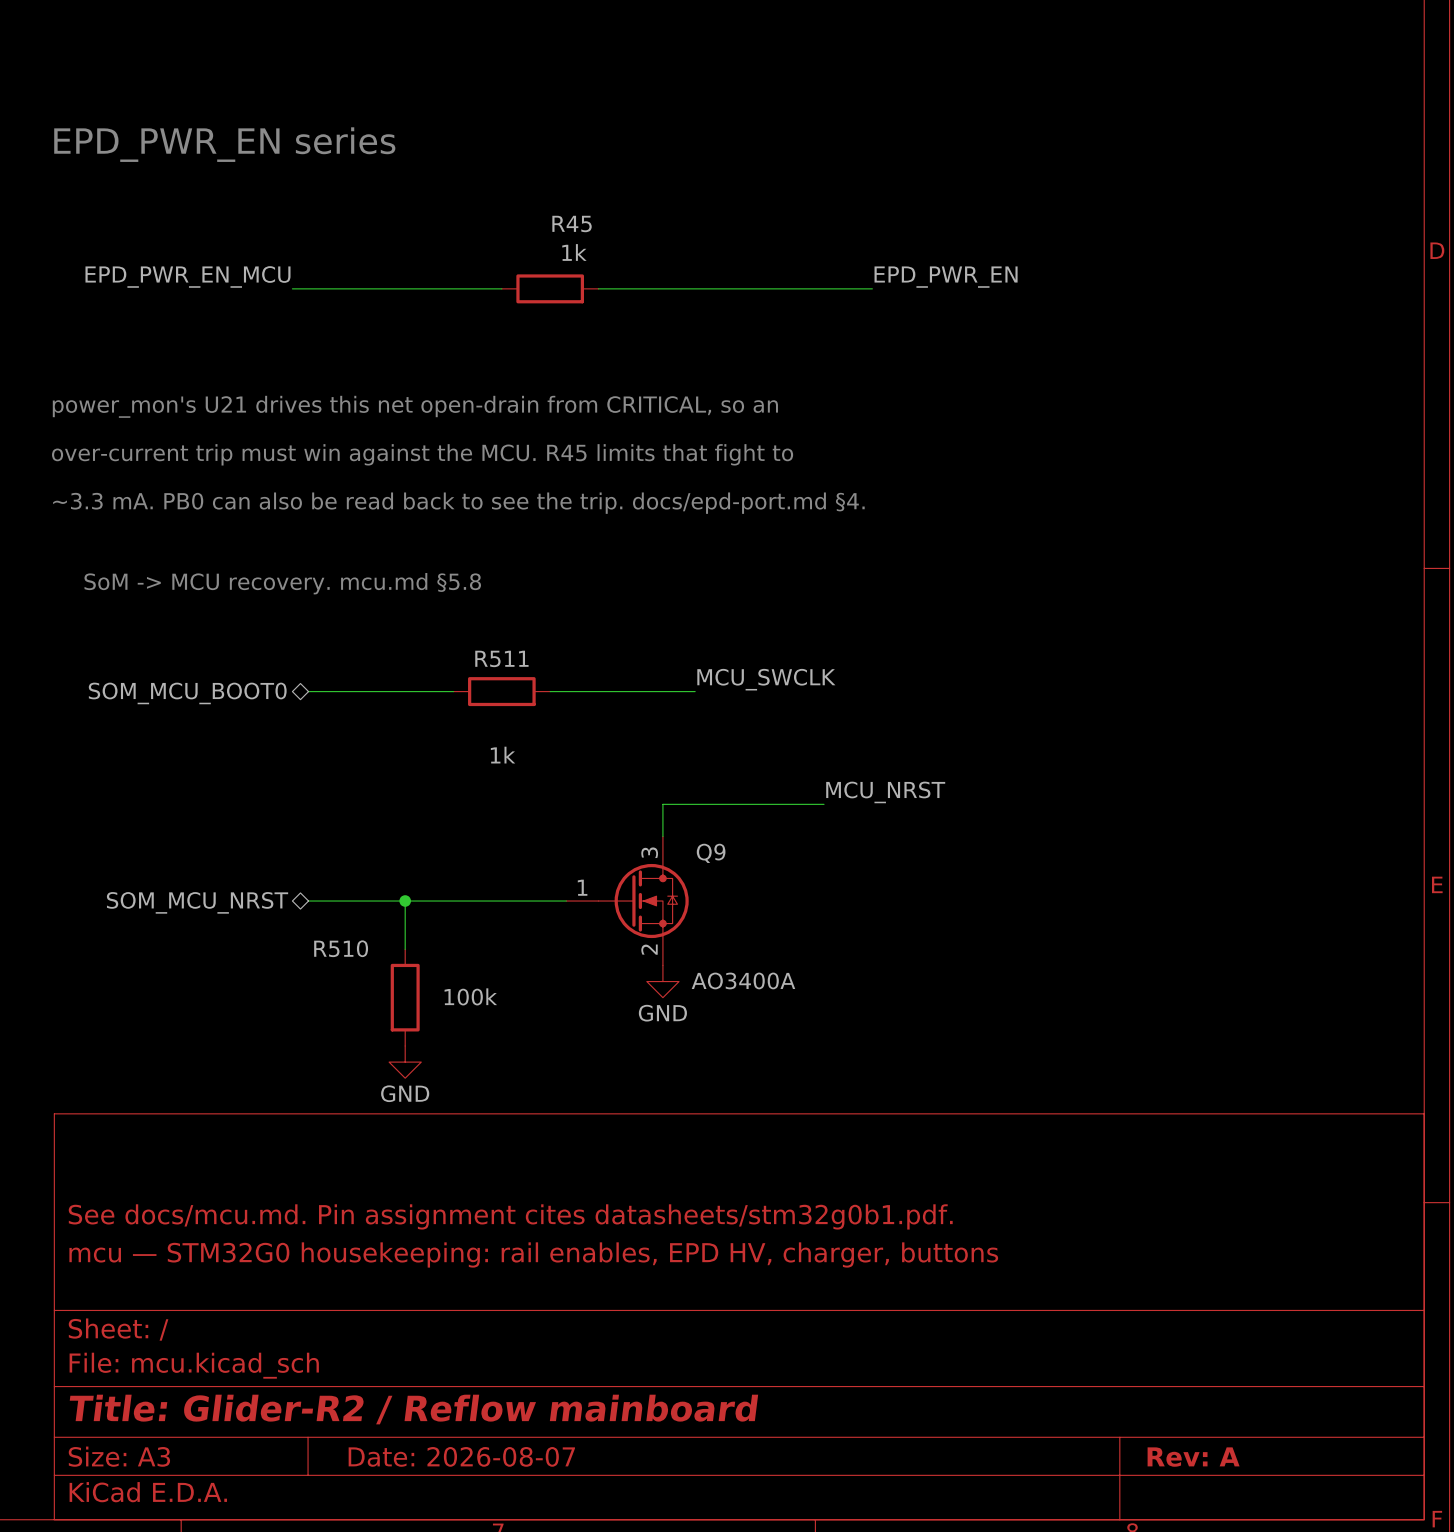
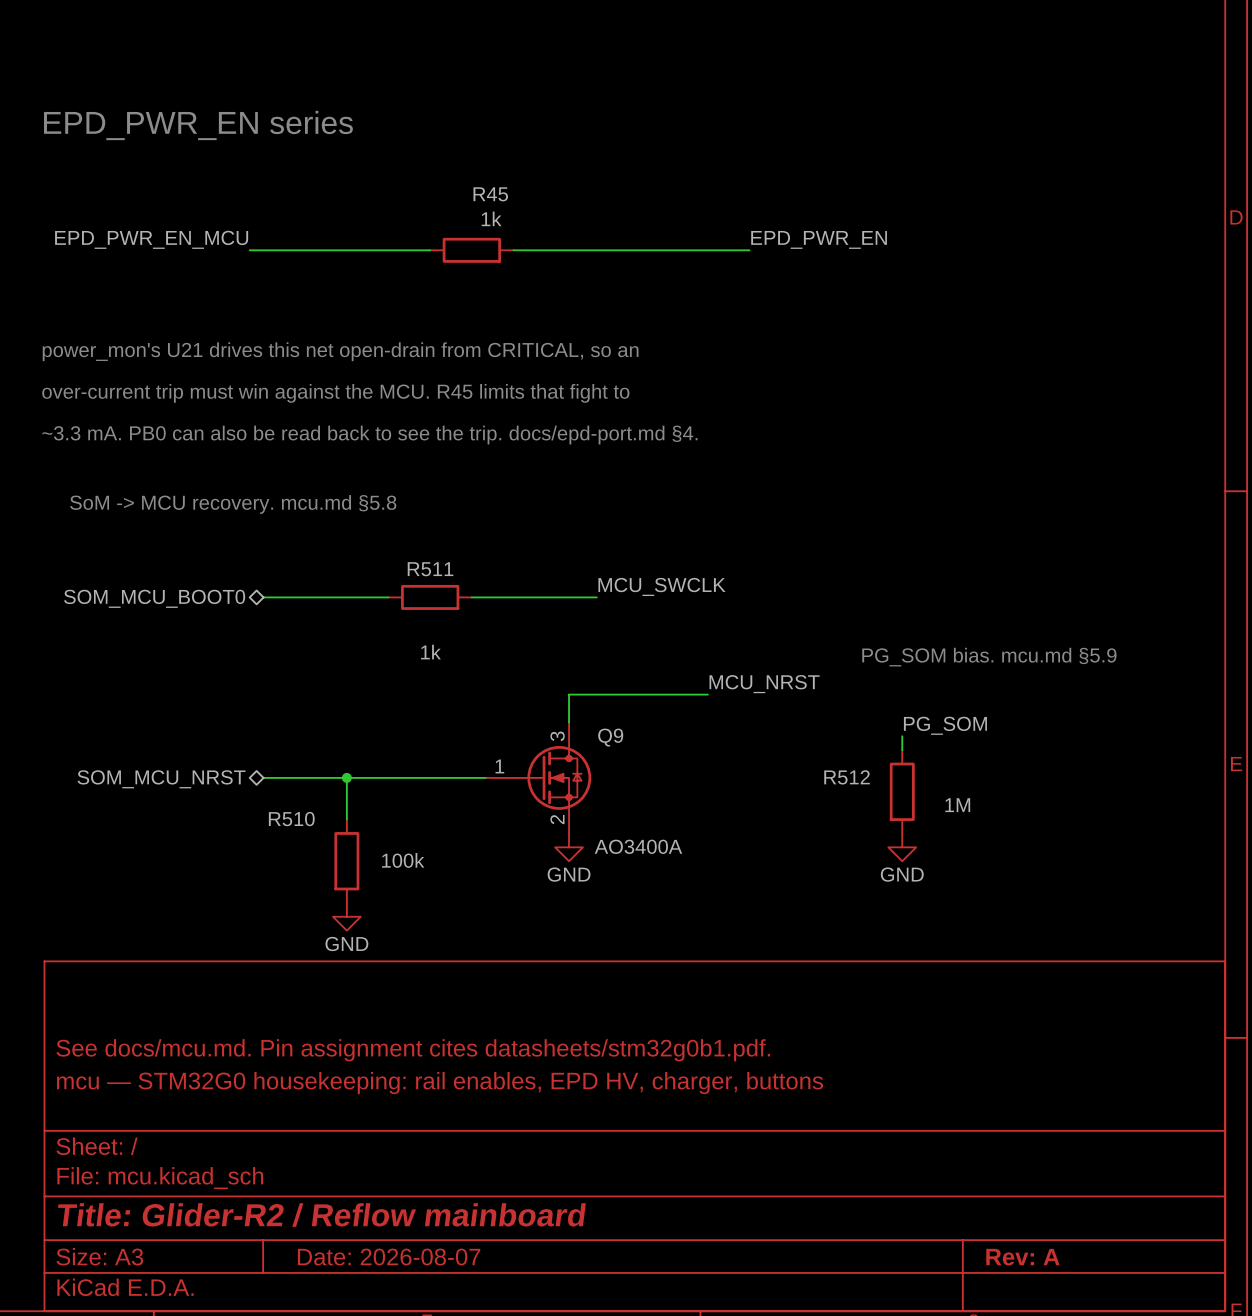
text: none -> PG_SOM bias. mcu.md §5.9 (989, 657)
label: none -> PG_SOM (945, 725)
wire: none -> (902, 736) (902, 750)
R512: none -> 1M (902, 791)
power symbol: none -> GND (902, 847)

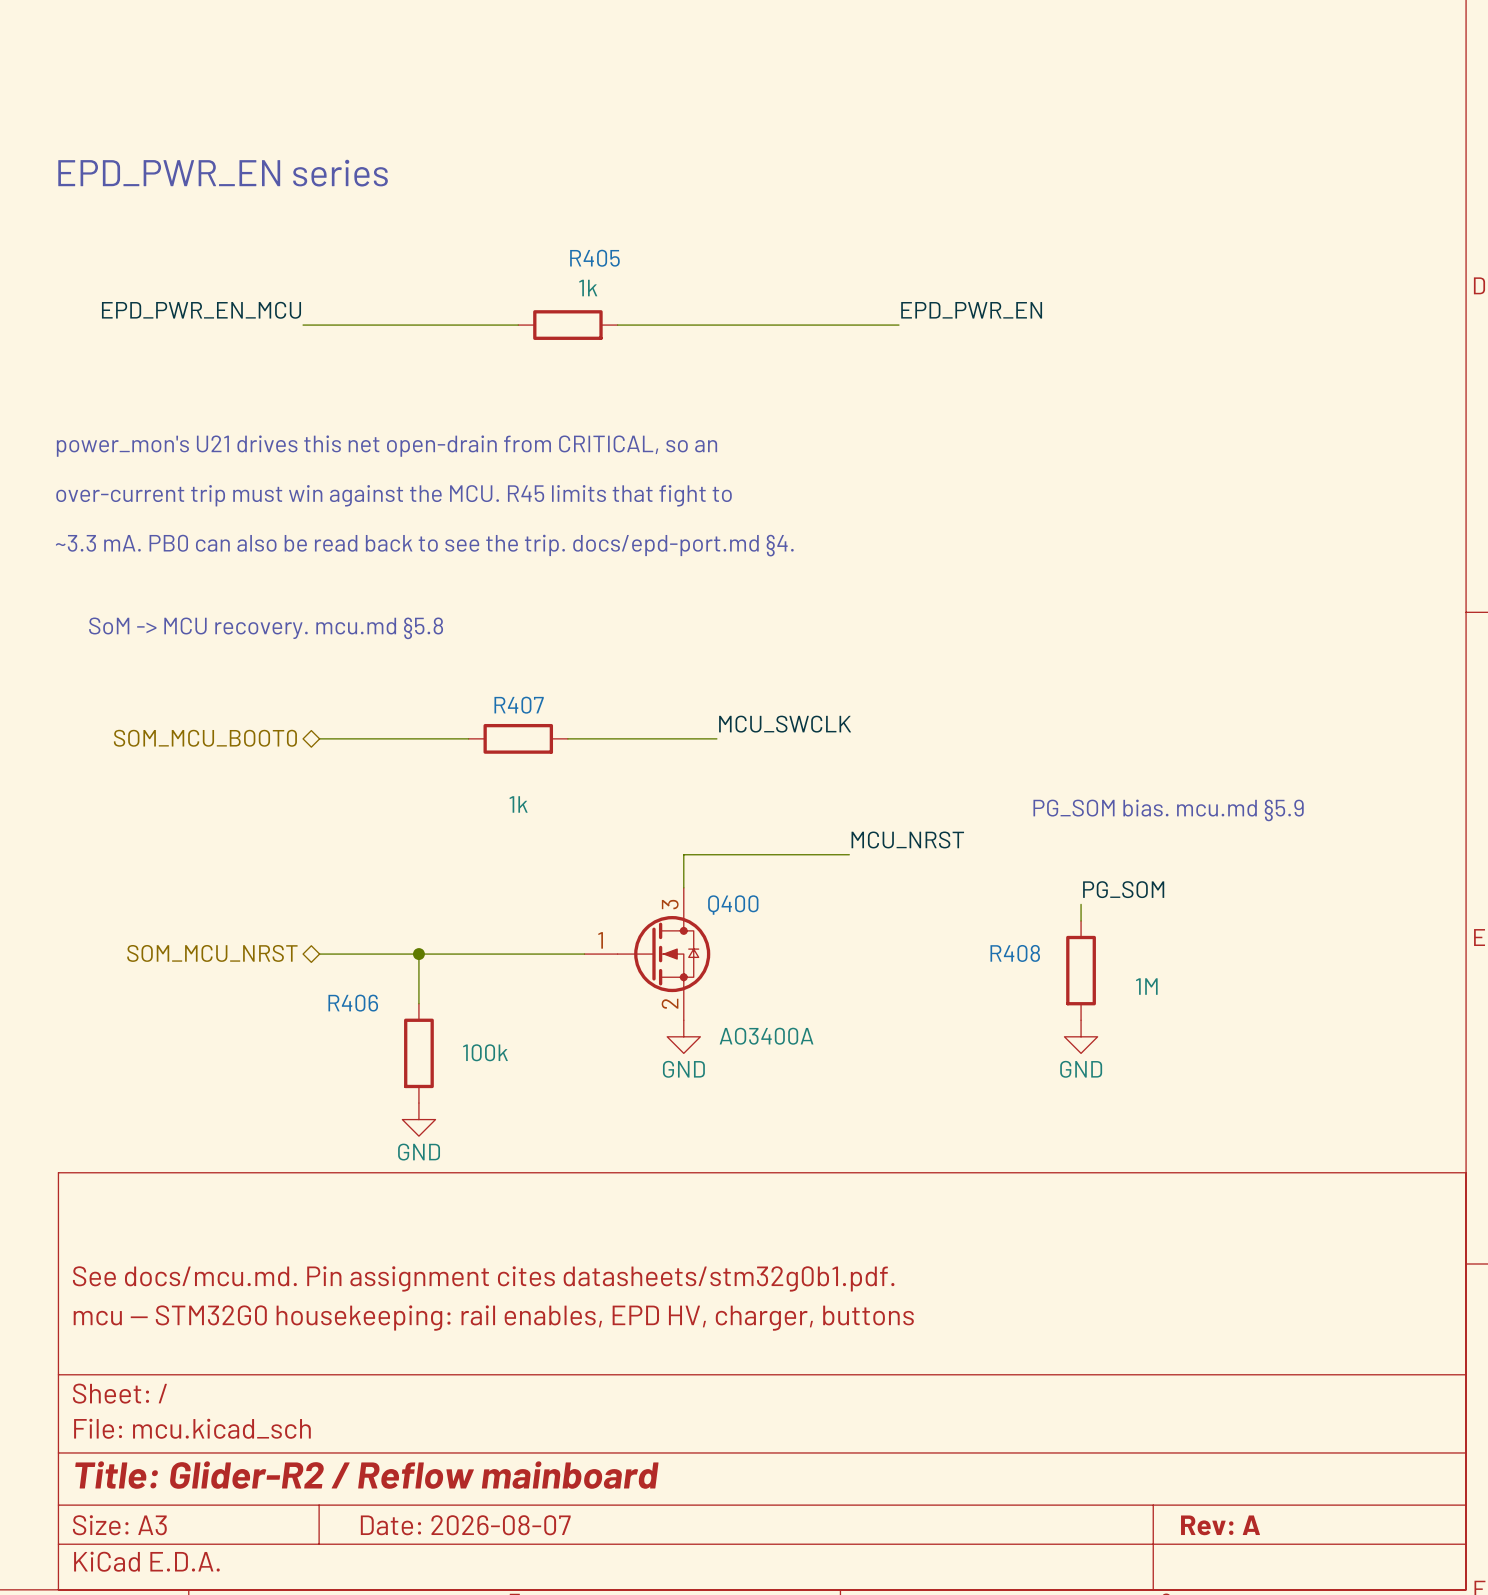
R45 name: R45 (490, 194) -> R405 (594, 258)
R511 name: R511 (430, 569) -> R407 (519, 705)
Q9 name: Q9 (610, 737) -> Q400 (733, 905)
R512 name: R512 (847, 777) -> R408 (1015, 953)
R510 name: R510 (291, 819) -> R406 (353, 1003)

